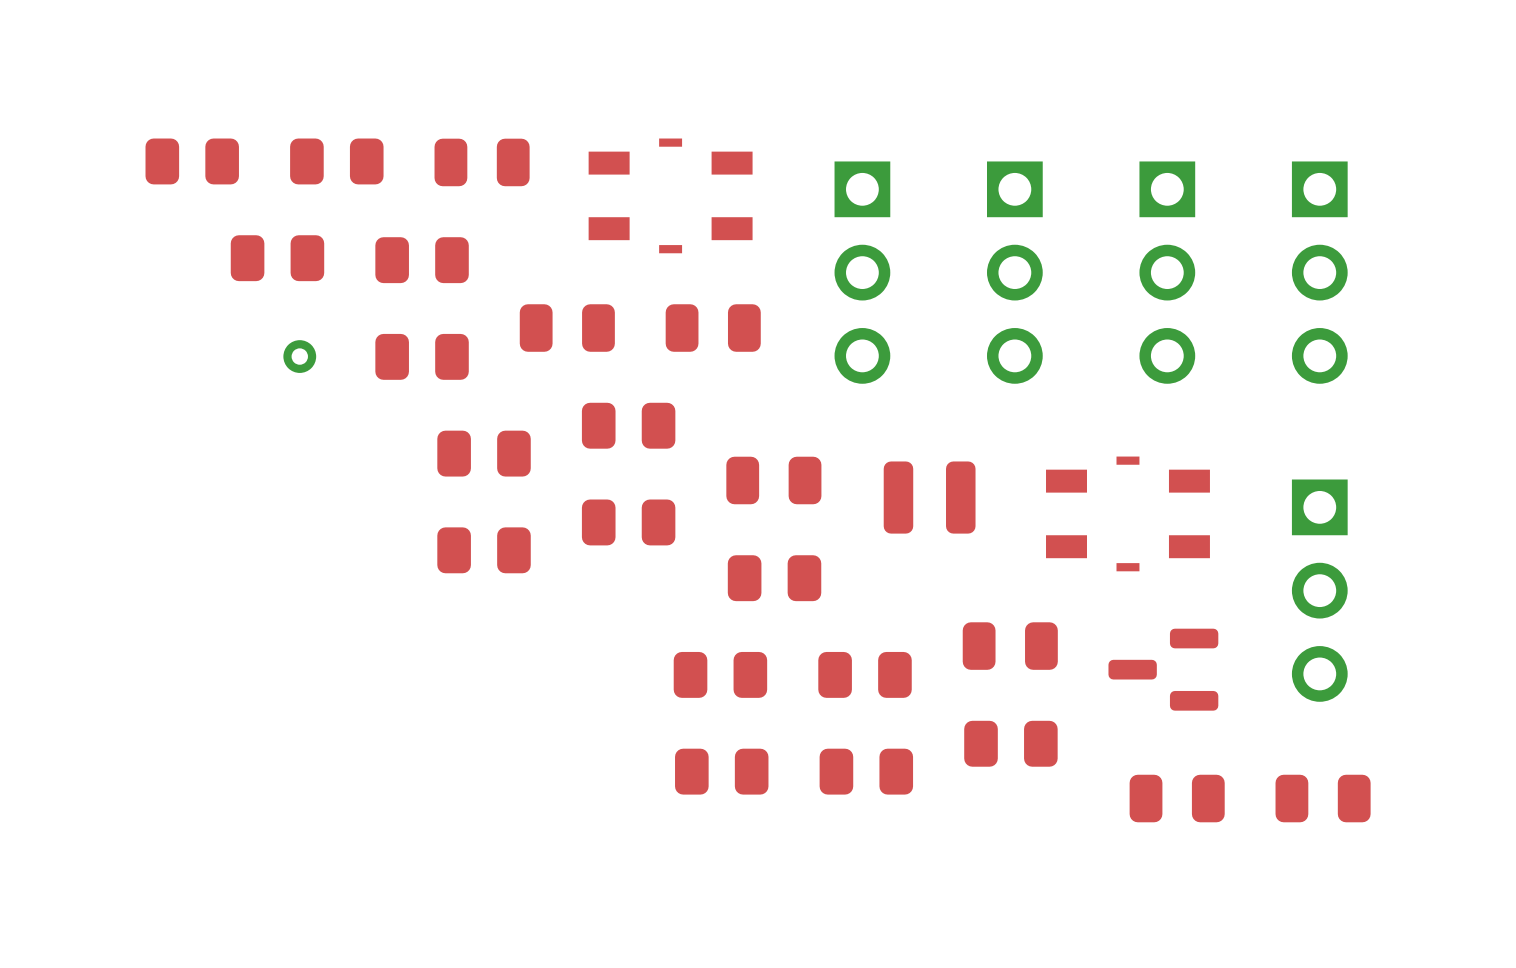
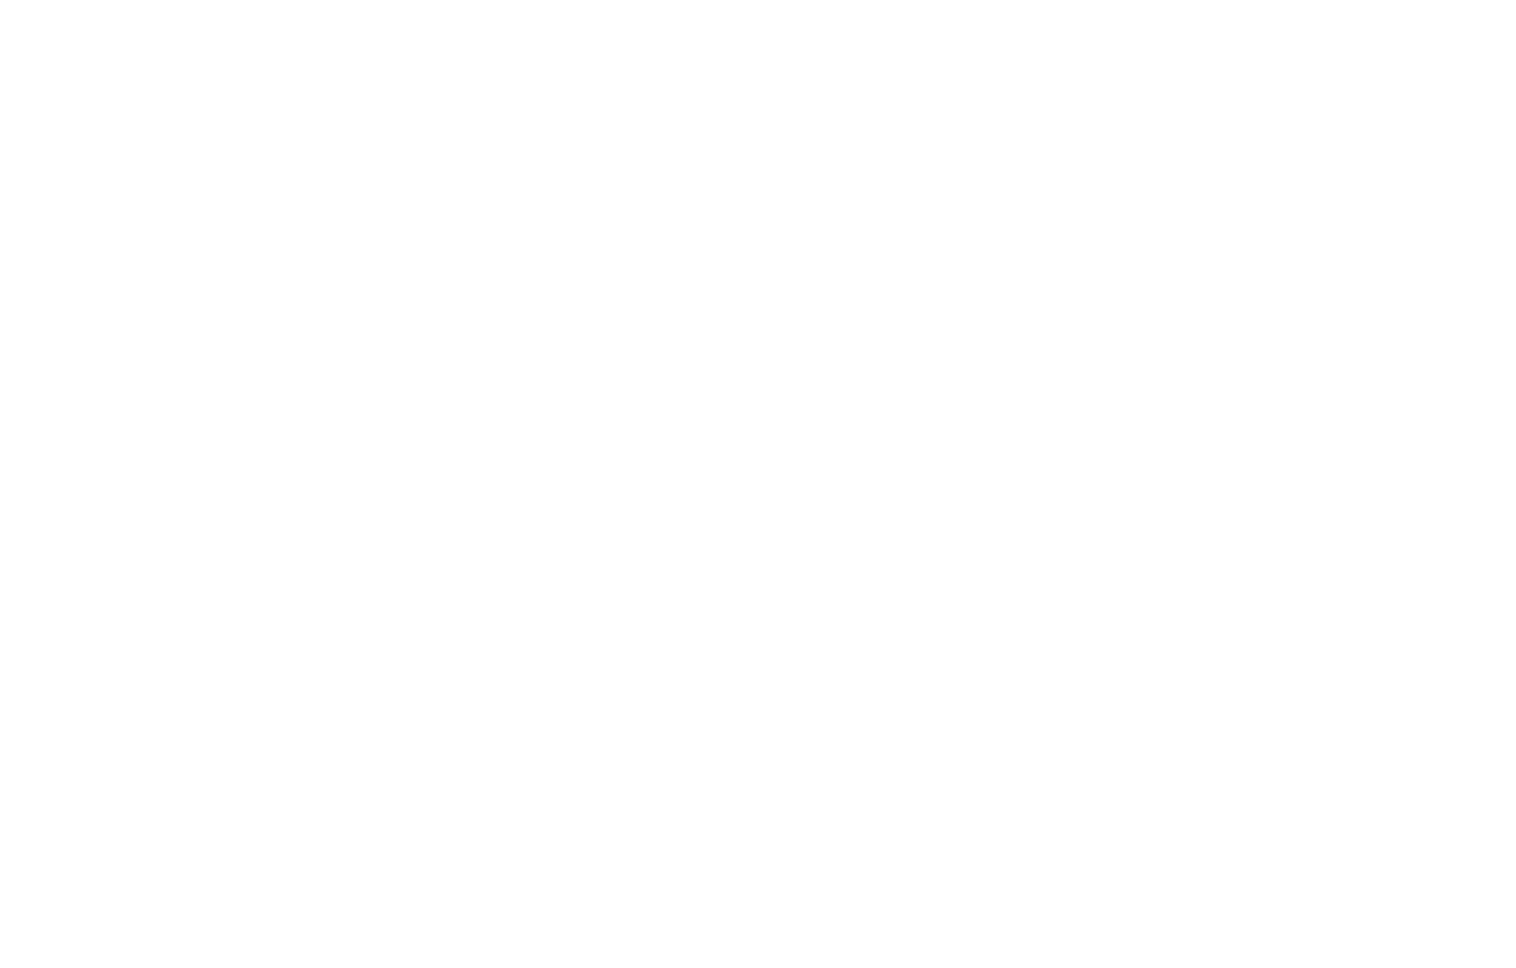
part: (192, 161) -> none
part: (336, 161) -> none
part: (482, 162) -> none
part: (670, 195) -> none
part: (277, 258) -> none
part: (422, 260) -> none
part: (862, 272) -> none
part: (1014, 272) -> none
part: (1167, 272) -> none
part: (1319, 272) -> none
part: (567, 328) -> none
part: (713, 328) -> none
part: (299, 356) -> none
part: (422, 356) -> none
part: (628, 425) -> none
part: (484, 453) -> none
part: (773, 480) -> none
part: (929, 497) -> none
part: (1127, 513) -> none
part: (628, 522) -> none
part: (484, 550) -> none
part: (774, 578) -> none
part: (1319, 590) -> none
part: (1010, 646) -> none
part: (1163, 669) -> none
part: (720, 674) -> none
part: (865, 674) -> none
part: (1010, 743) -> none
part: (721, 771) -> none
part: (866, 771) -> none
part: (1177, 798) -> none
part: (1323, 798) -> none

